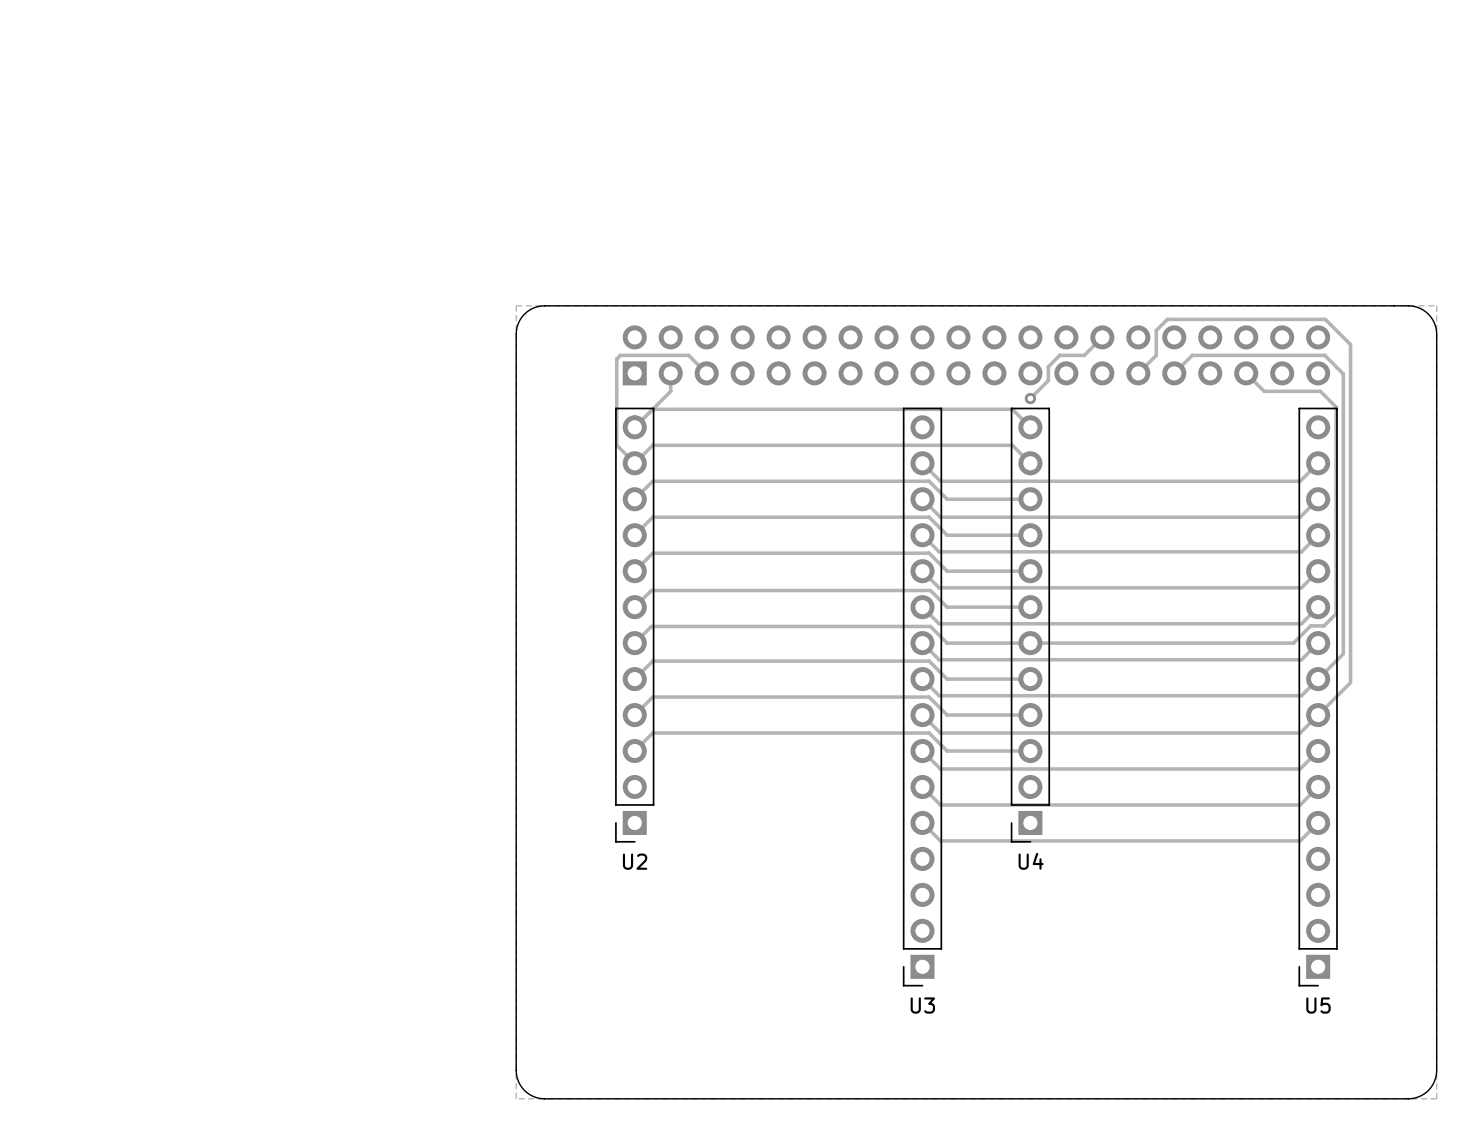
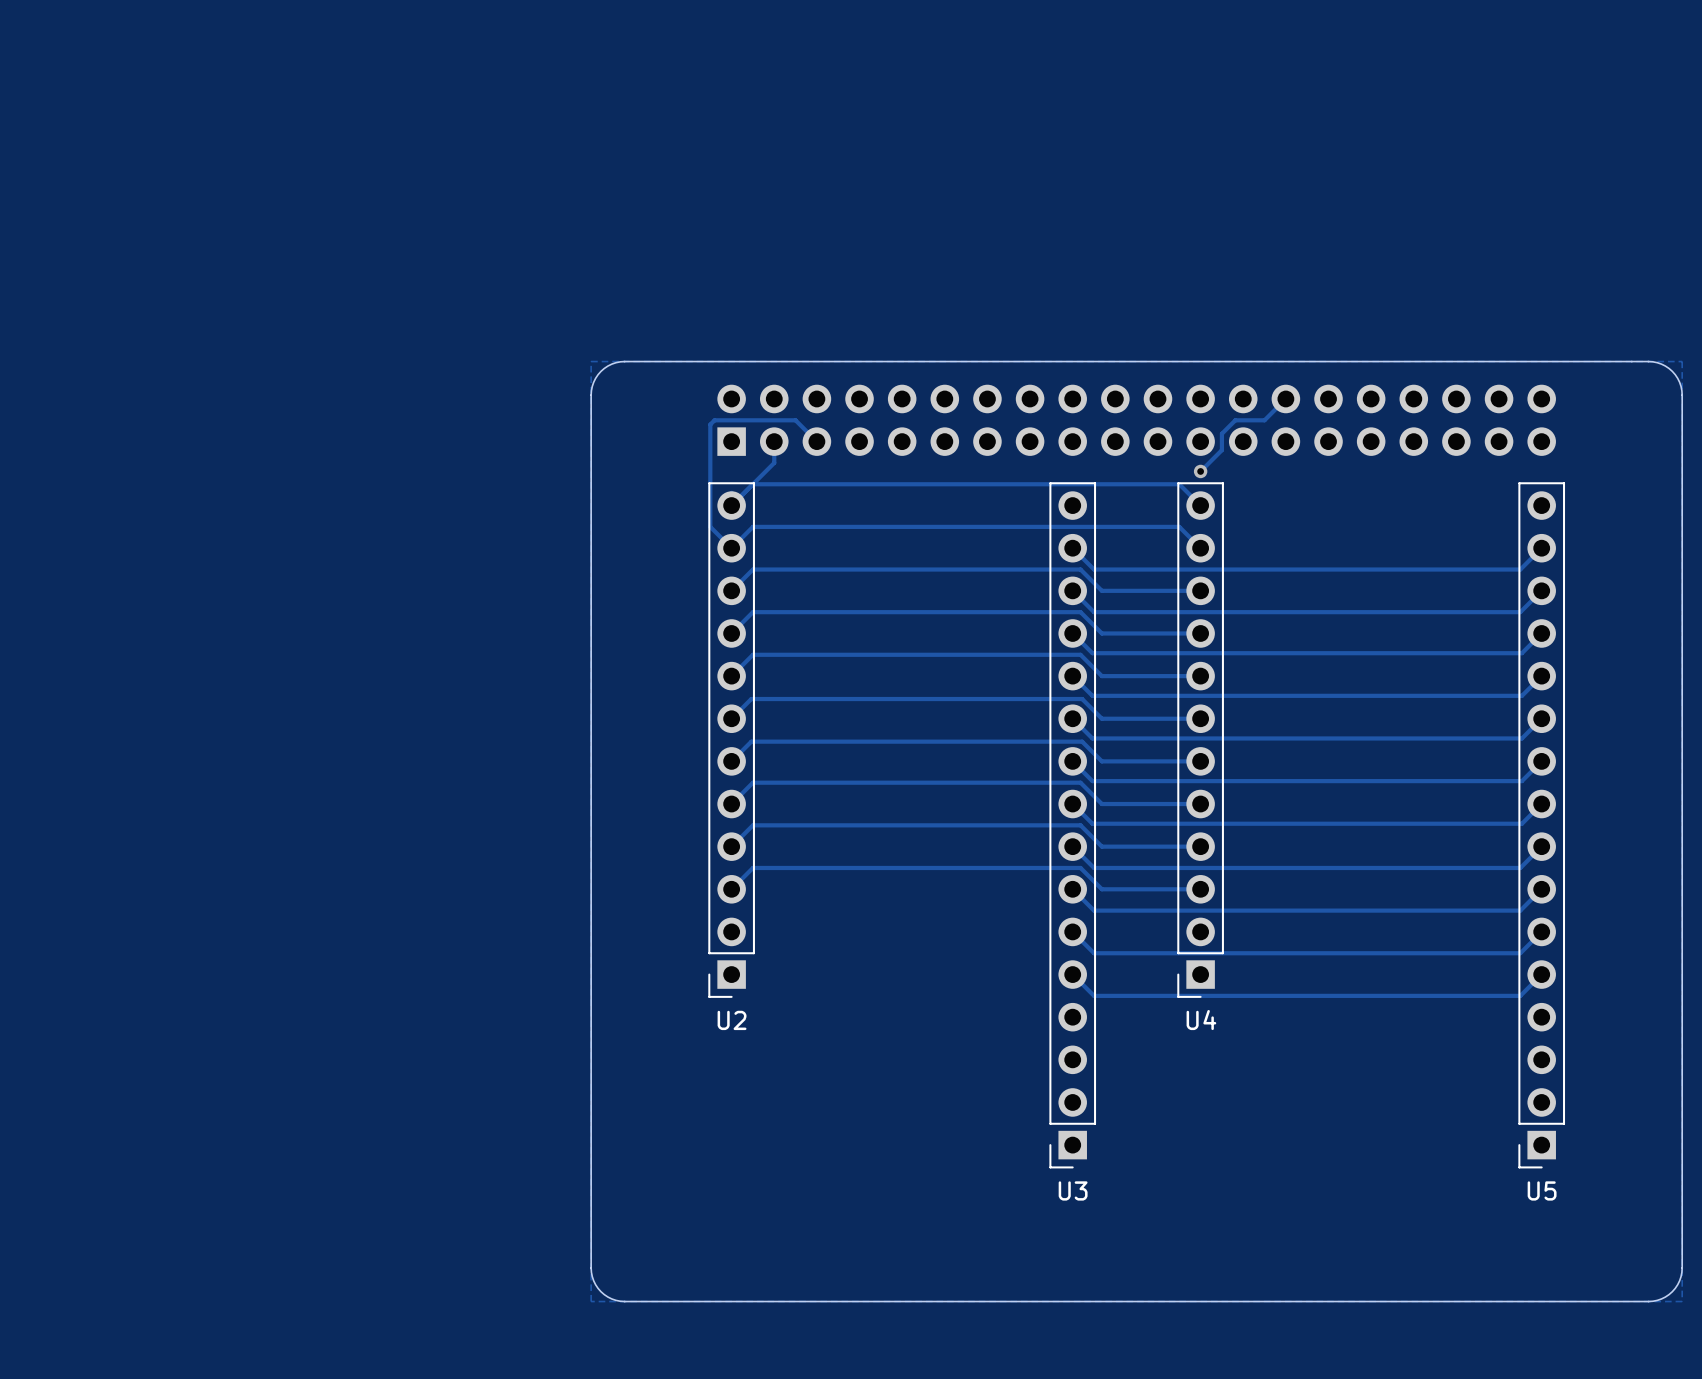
track: (1138, 373) (1156, 355) (1156, 330) (1167, 319) (1325, 319) (1350, 344) (1350, 682) (1318, 715) -> none
track: (1174, 373) (1192, 355) (1324, 355) (1343, 373) (1343, 653) (1318, 679) -> none
track: (1246, 373) (1264, 391) (1320, 391) (1336, 407) (1336, 613) (1323, 625) (1310, 625) (1293, 643) (1030, 643) -> none

